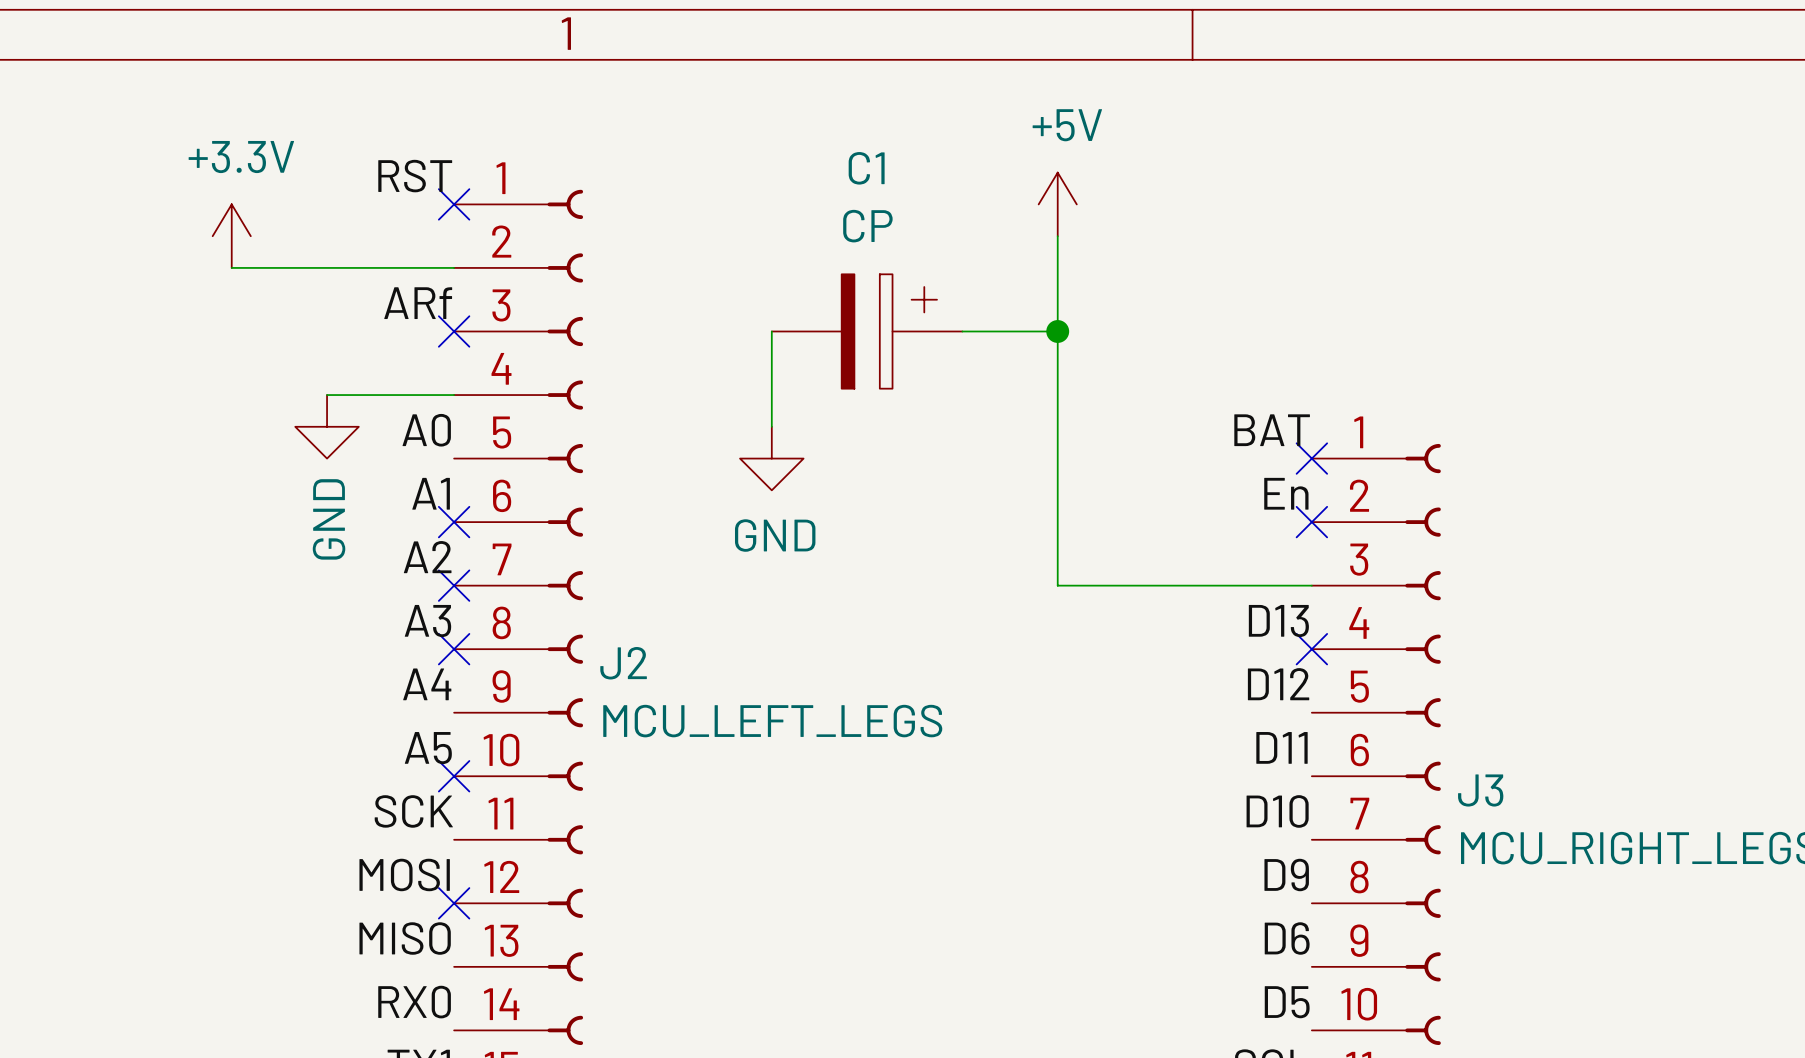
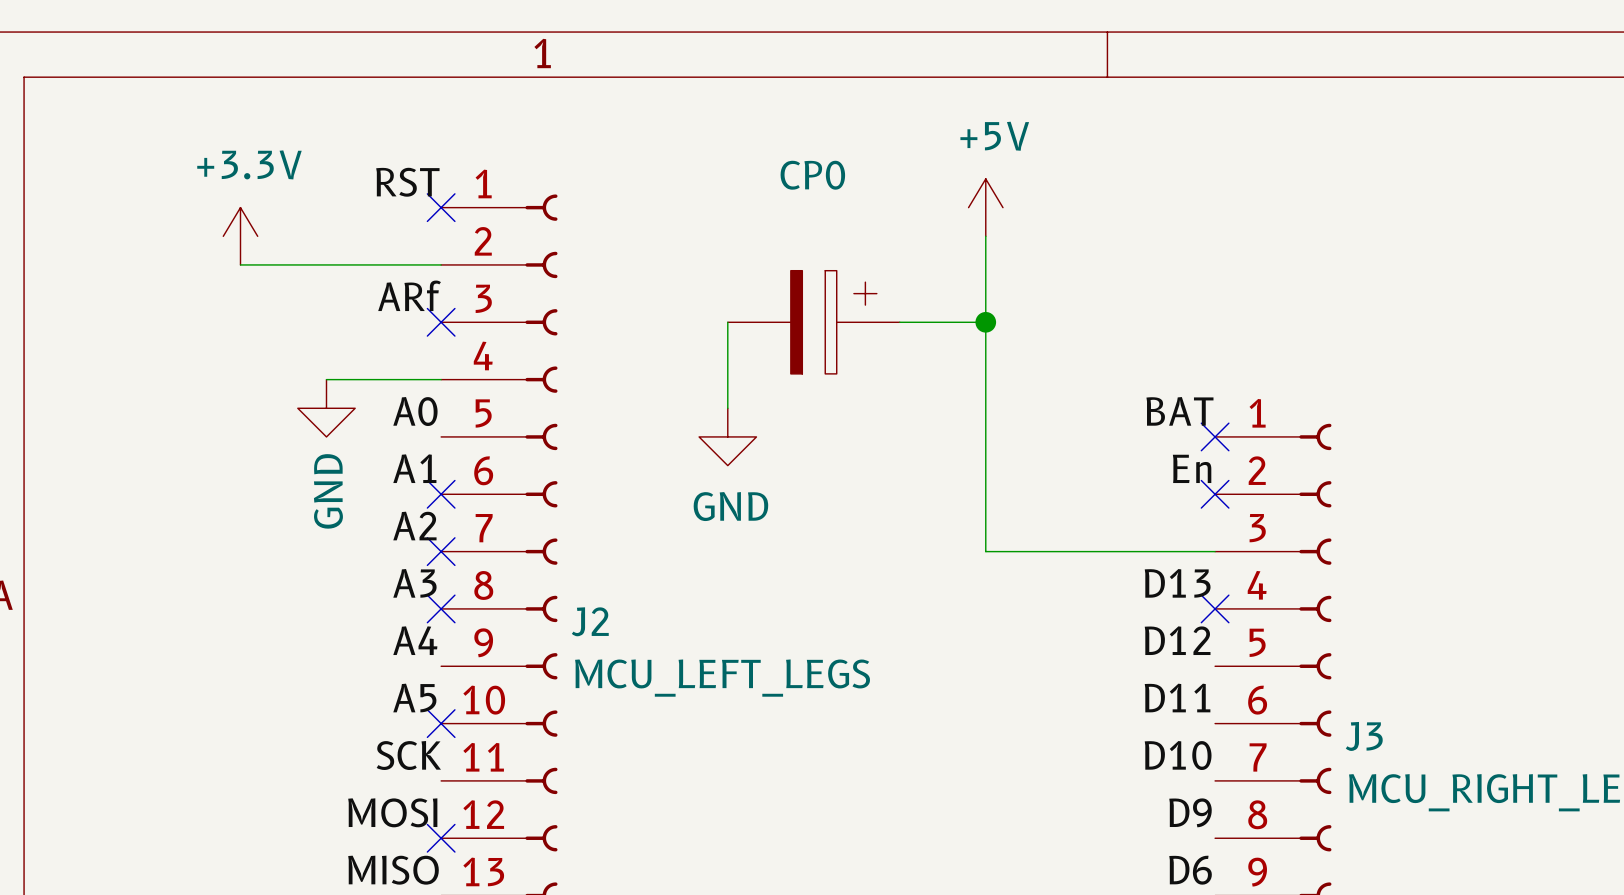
C1 name: C1 (866, 168) -> CP0 (812, 175)
C1 value: CP (867, 226) -> none

